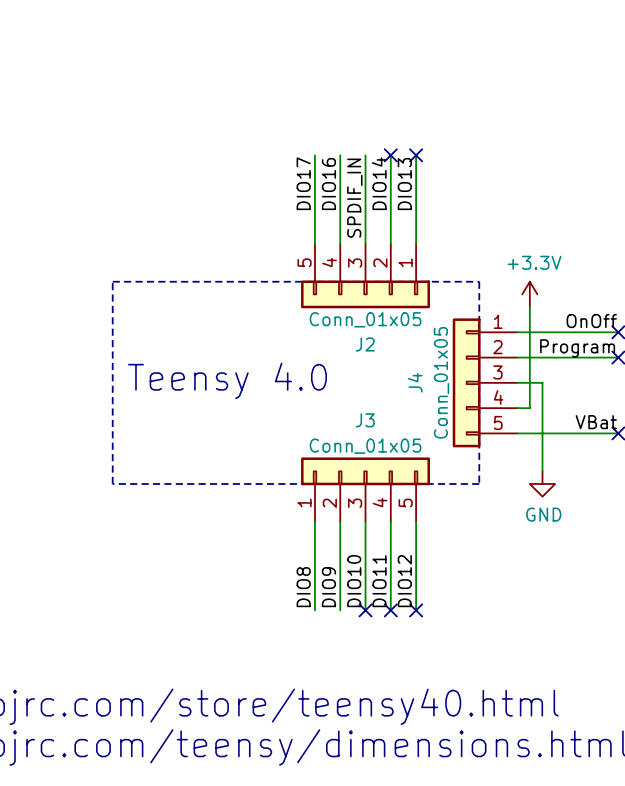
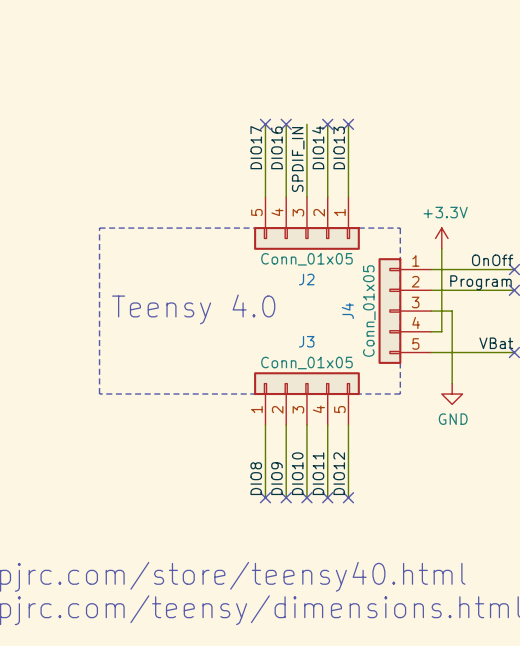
no-connect mark: none -> (265, 124)
no-connect mark: none -> (286, 124)
no-connect mark: none -> (265, 497)
no-connect mark: none -> (286, 497)

